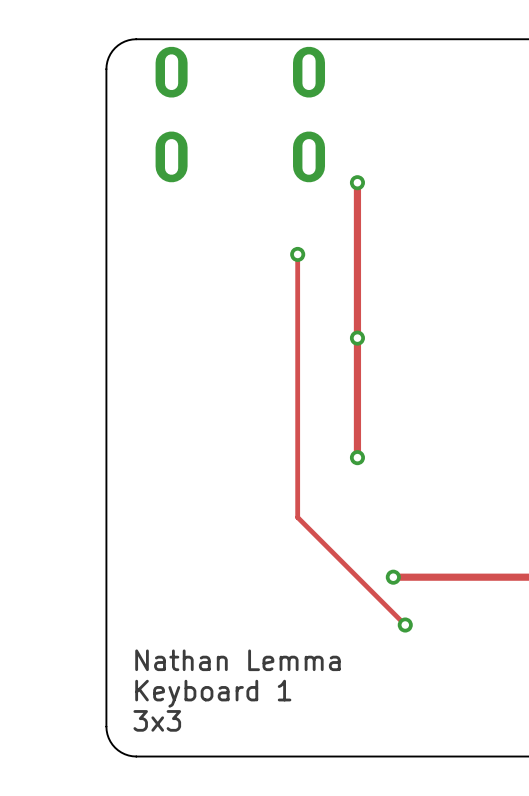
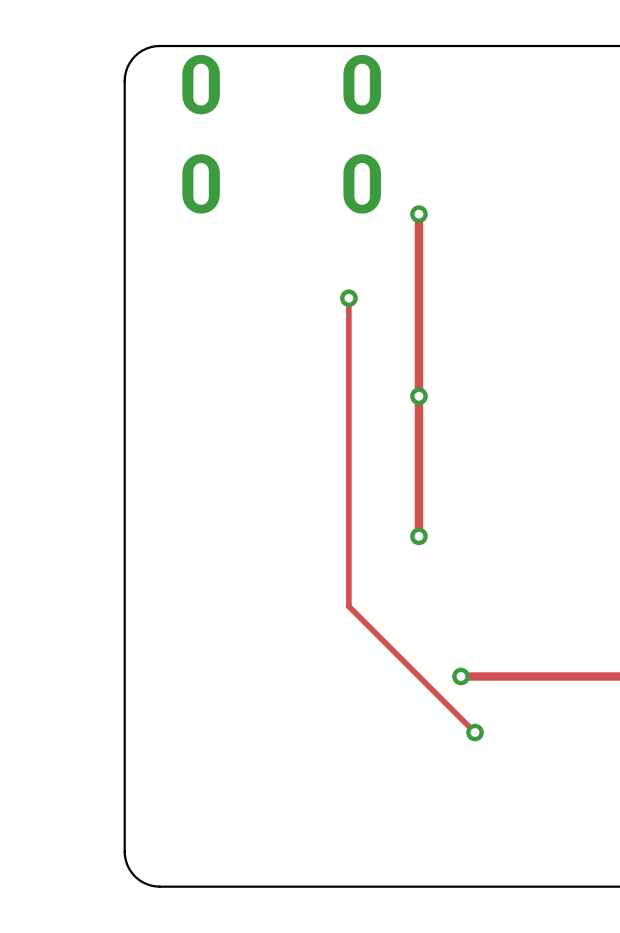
text: Nathan Lemma (237, 660) -> none
text: Keyboard 1 (213, 693) -> none
text: 3x3 (157, 720) -> none

